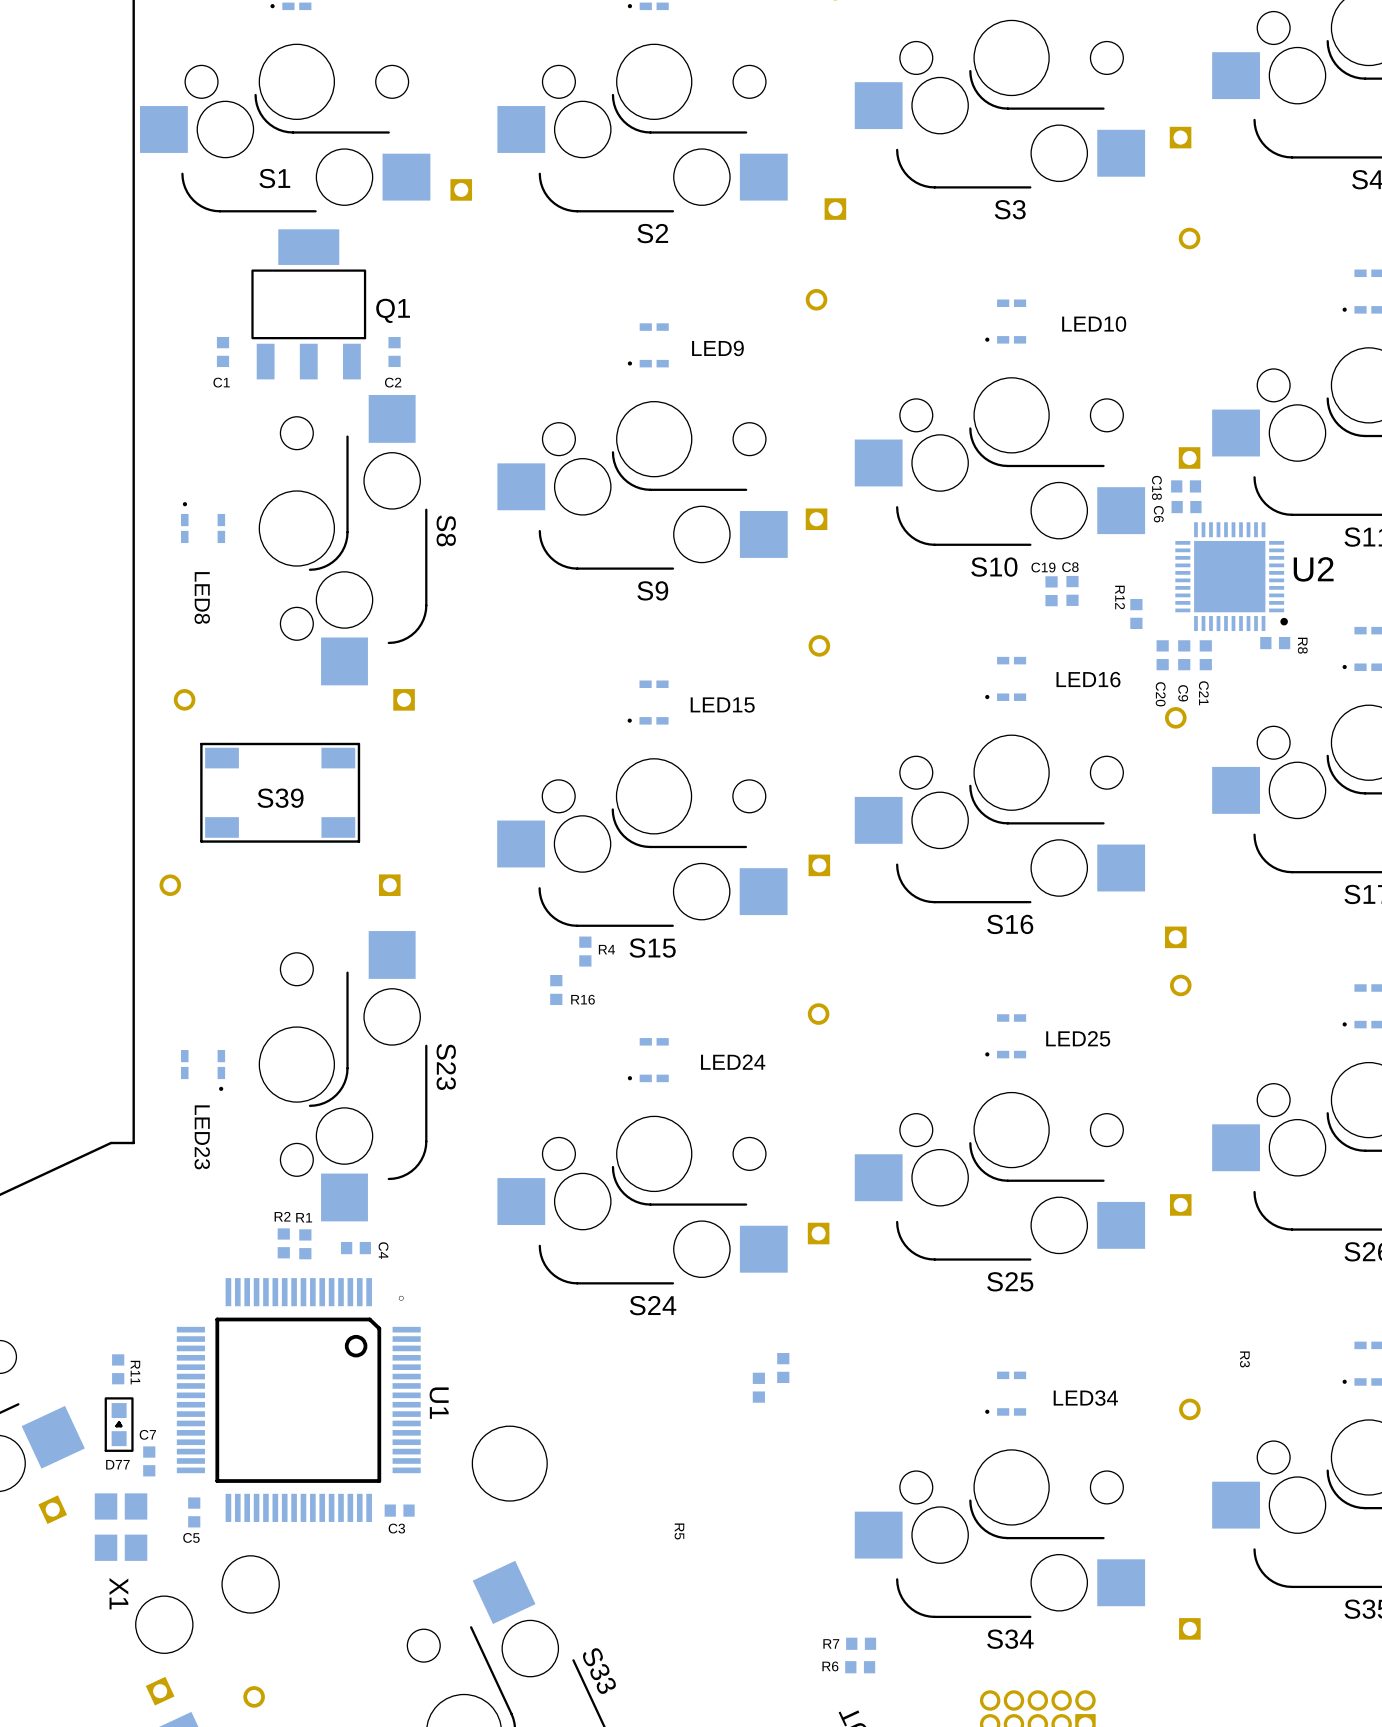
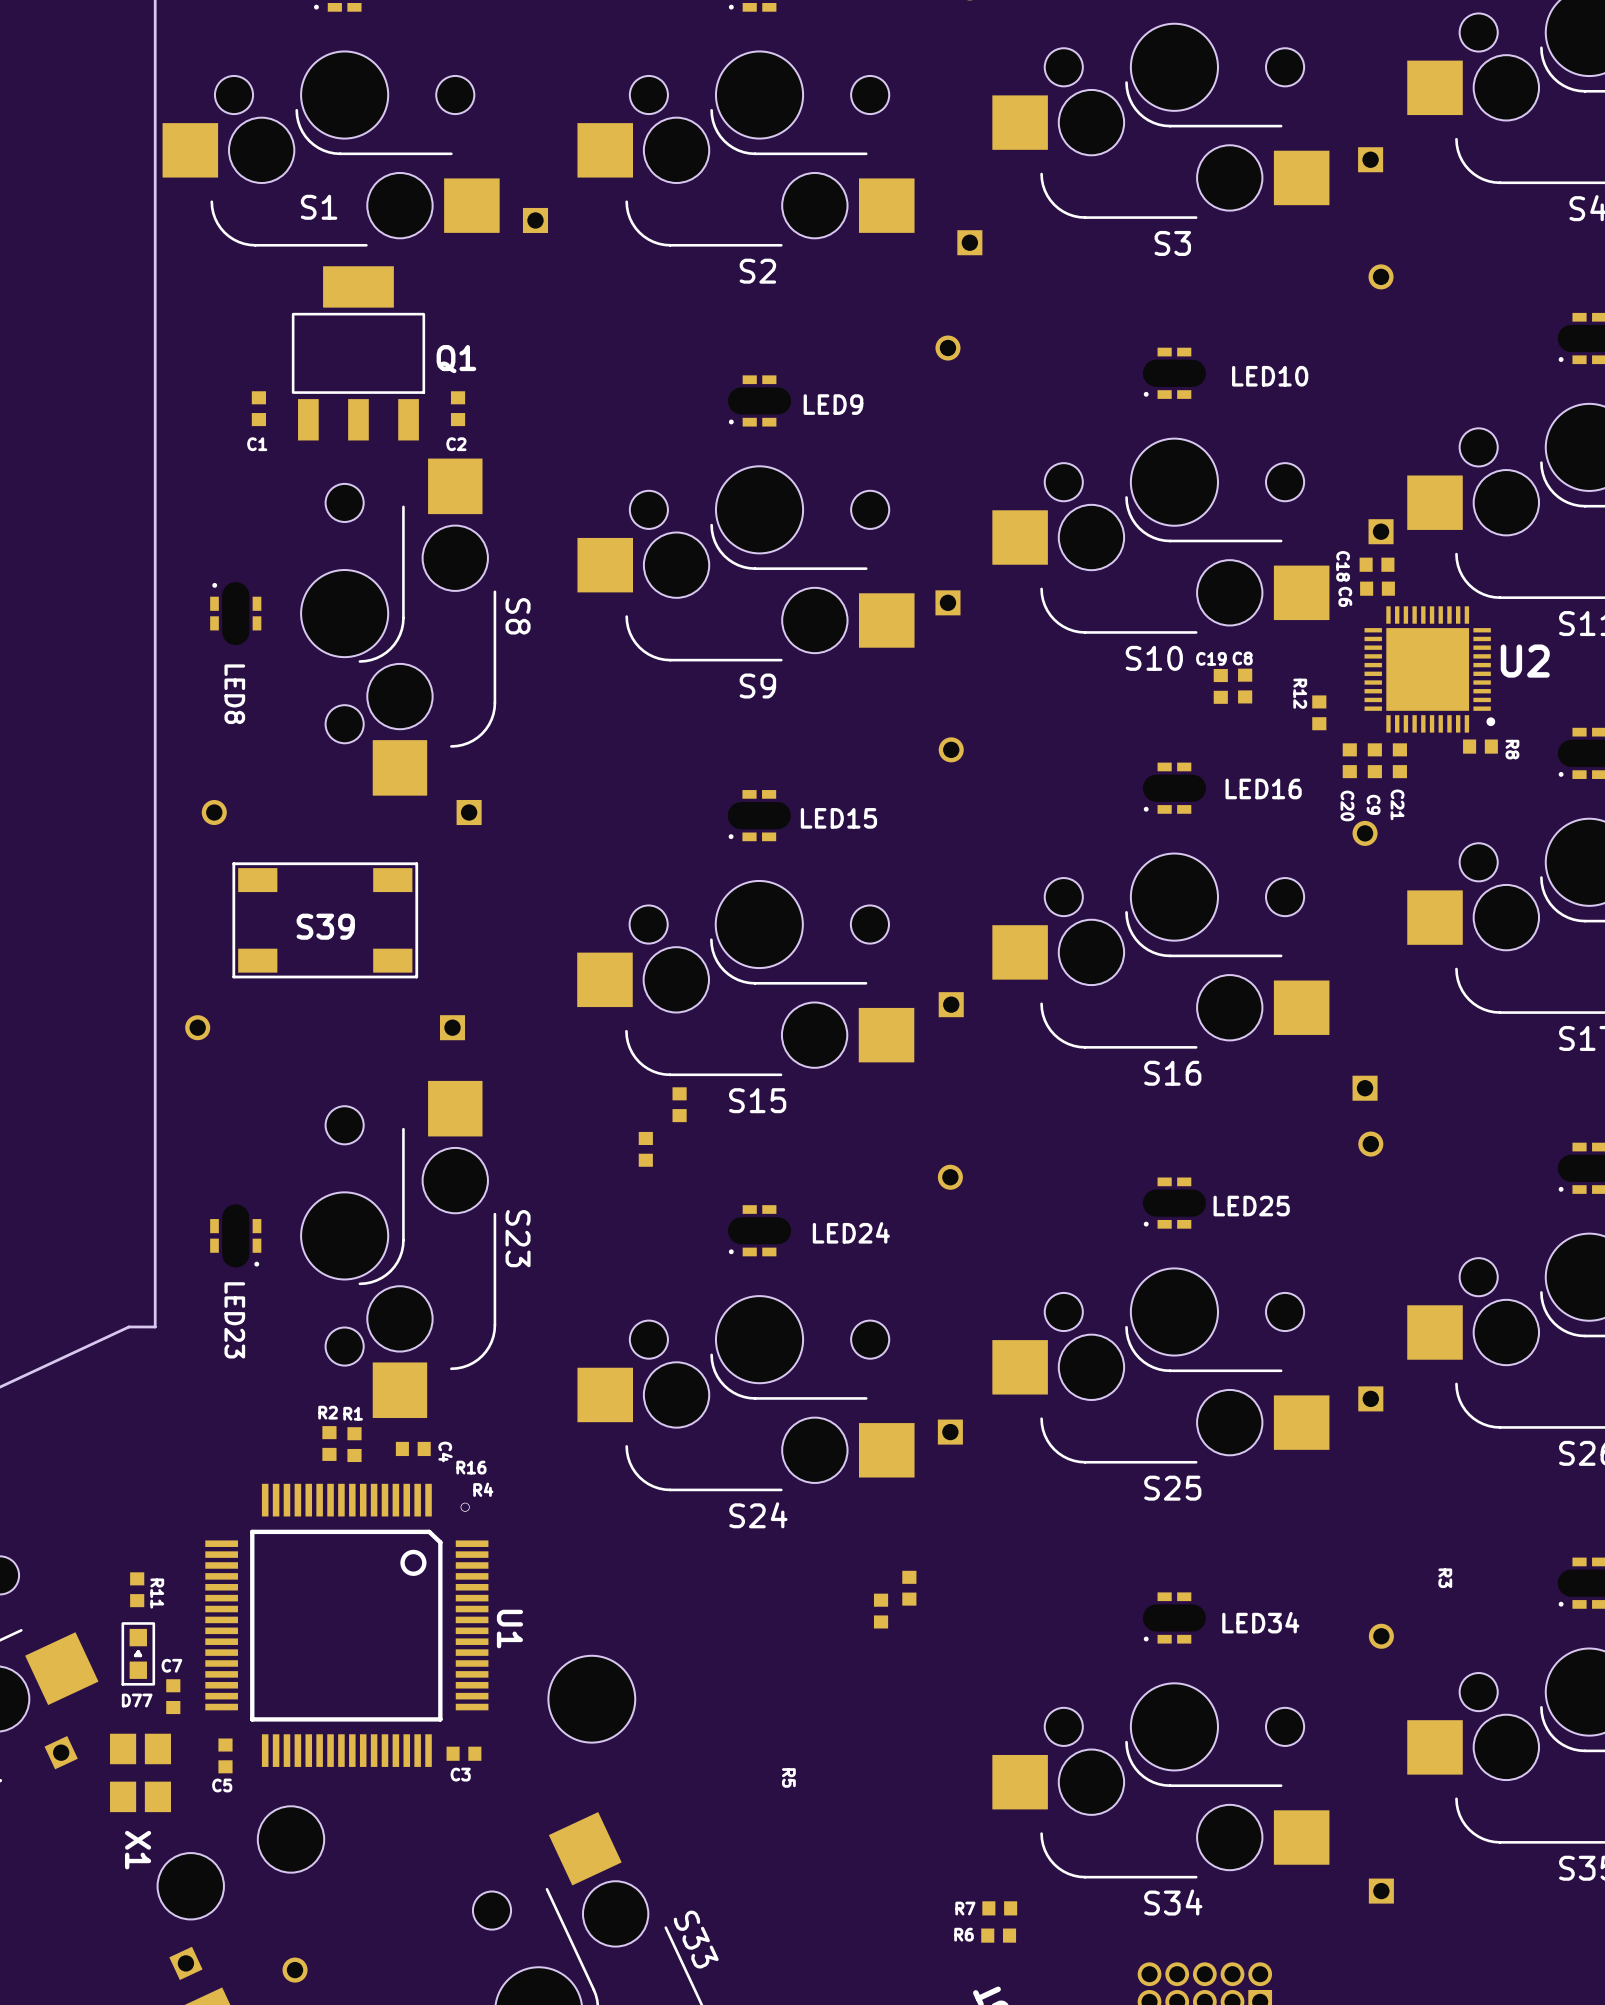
R4 name position: R4 (606, 949) -> R4 (483, 1489)
R16 name position: R16 (583, 999) -> R16 (471, 1467)

